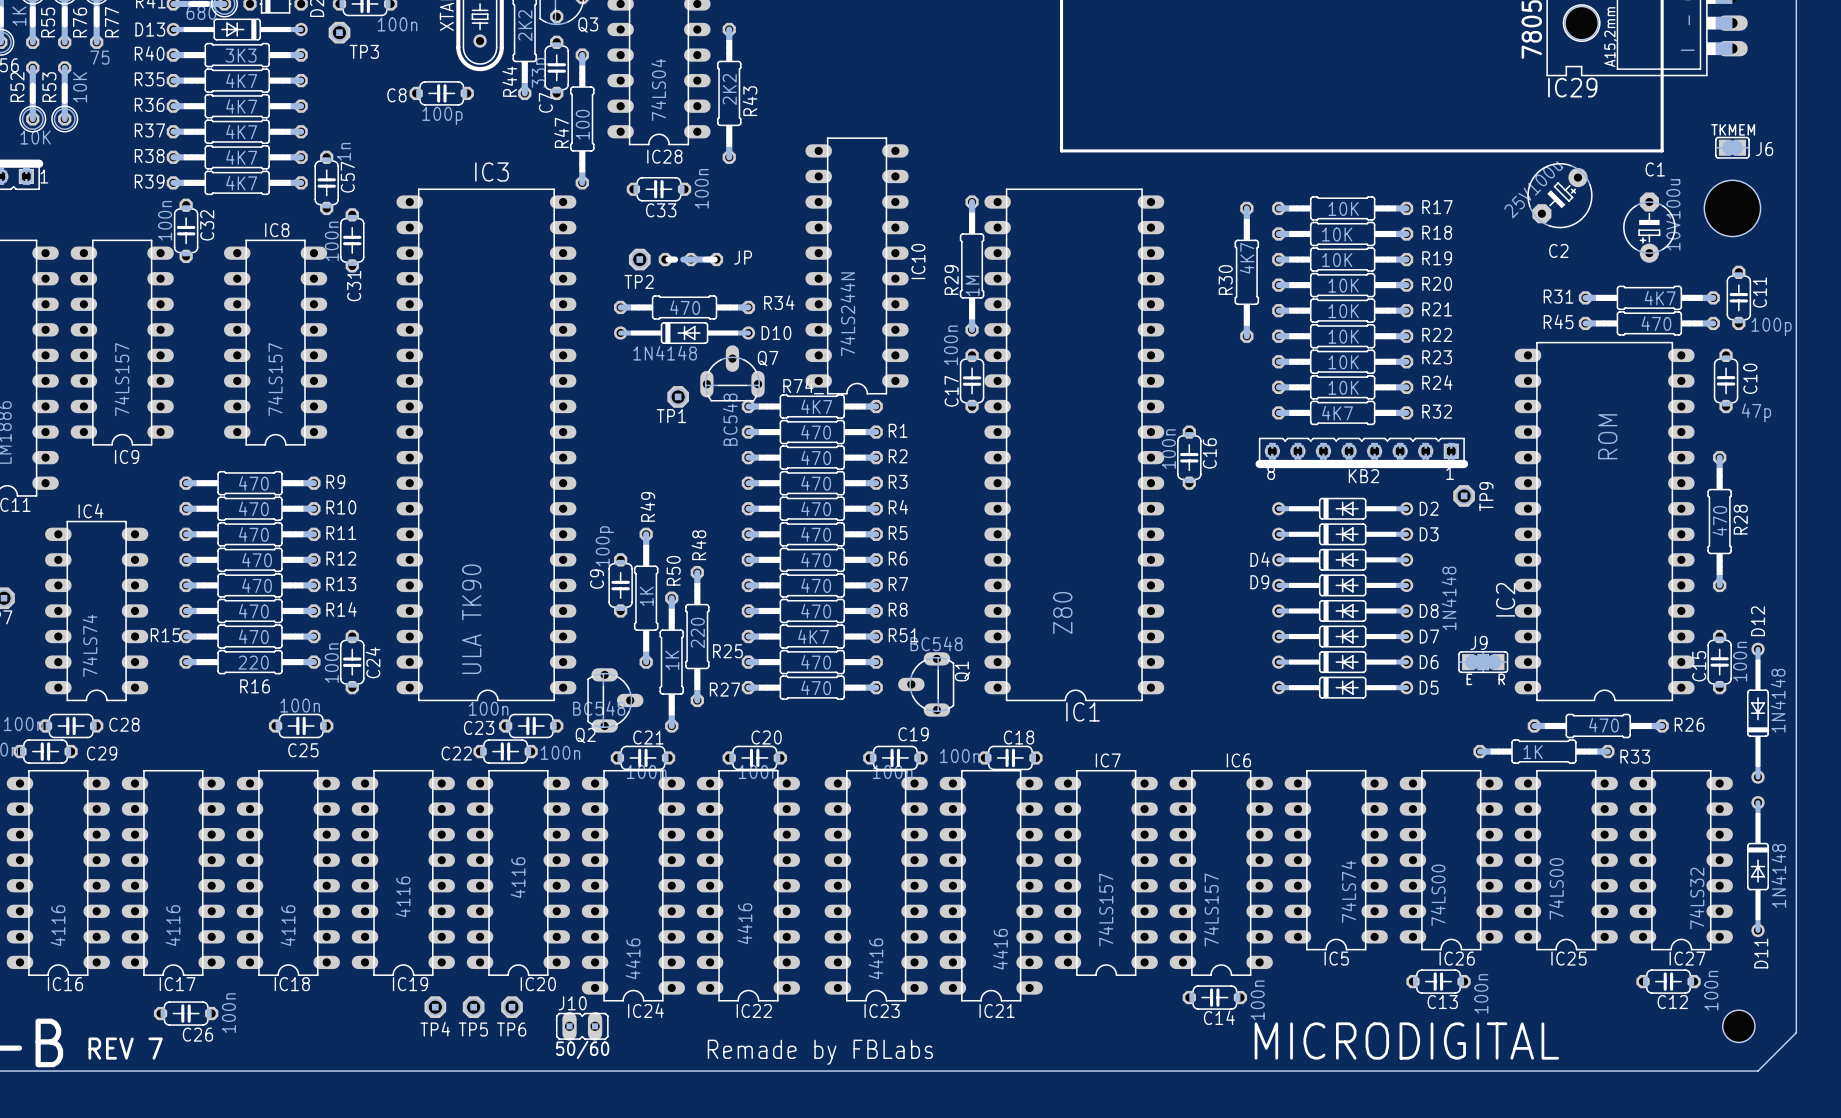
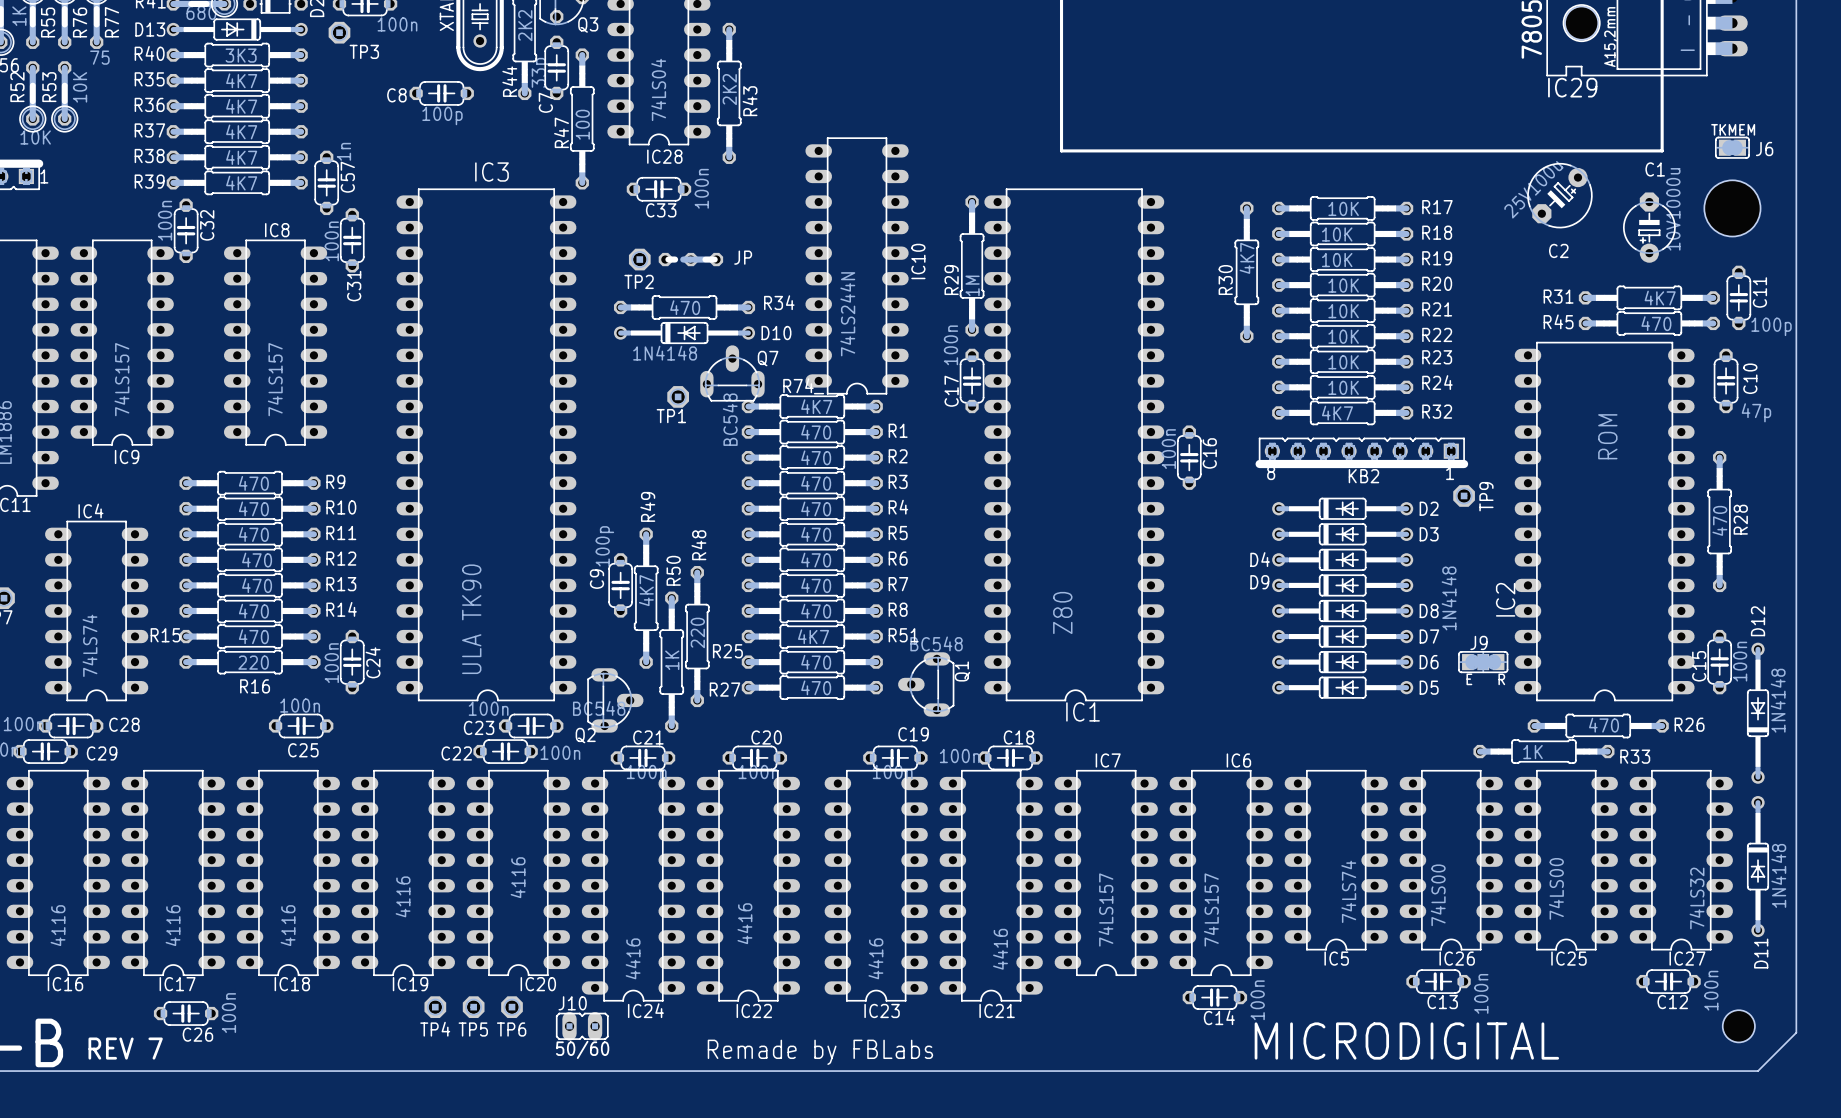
C1 value: 10V100u (1673, 214) -> 10V1000u (1673, 209)
R49 value: 1K (646, 596) -> 4K7 (646, 590)

